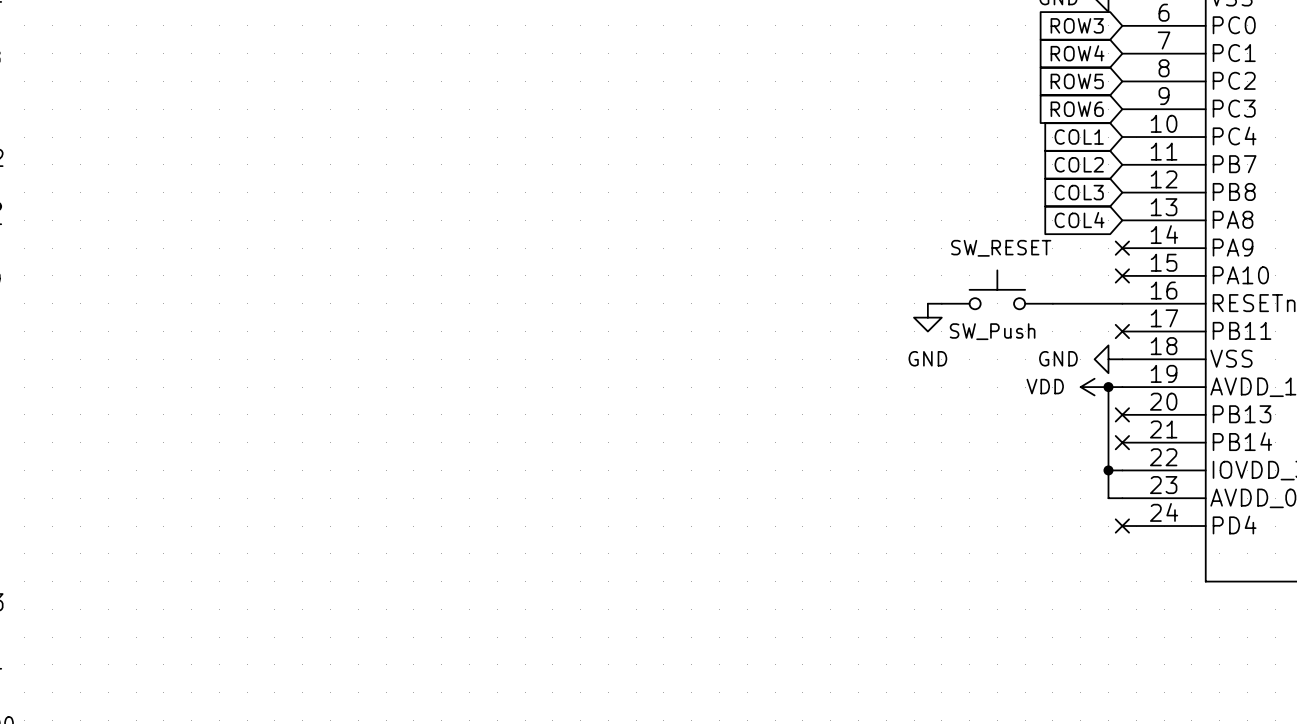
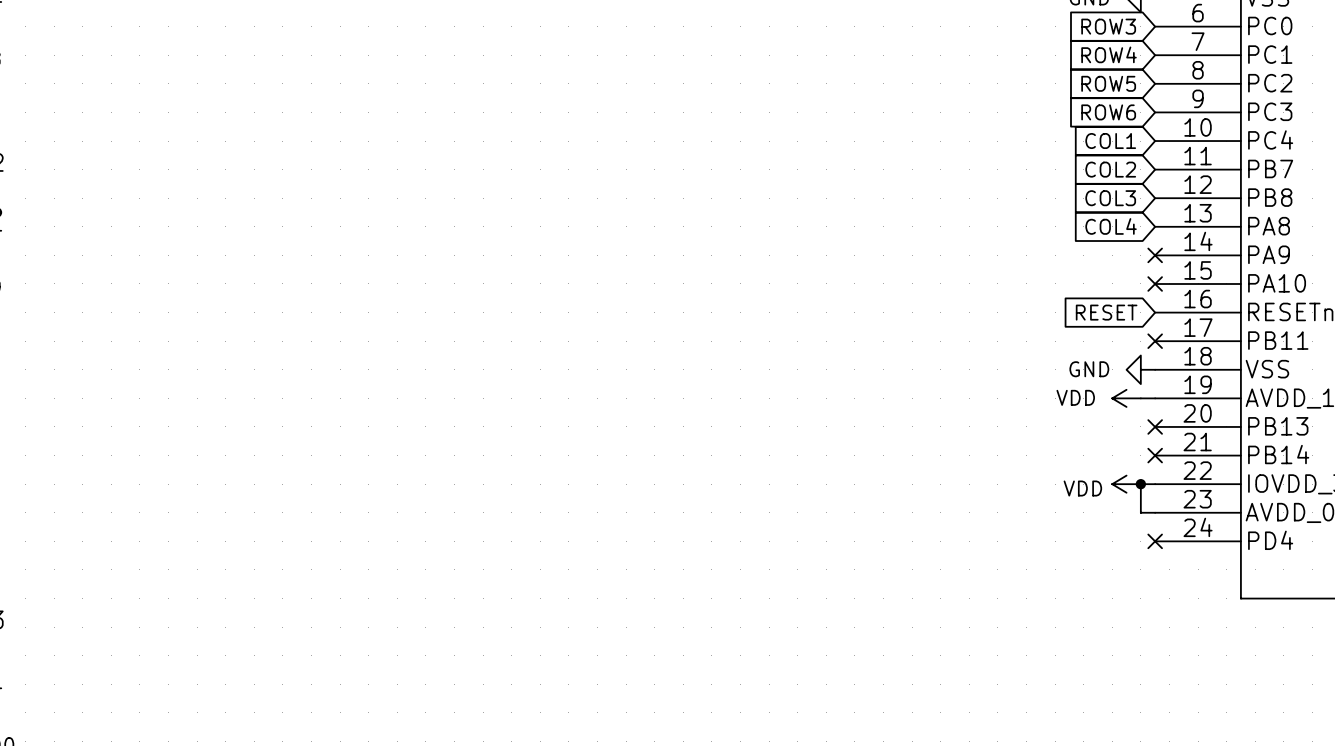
SW_RESET: SW_Push (997, 289) -> none
wire: (927, 303) (941, 303) -> none
wire: (1052, 303) (1122, 303) -> none
global label: none -> RESET (1106, 312)
power symbol: GND (927, 317) -> none
wire: (1108, 387) (1108, 470) -> none
junction: (1108, 387) -> none
power symbol: none -> VDD (1126, 484)

